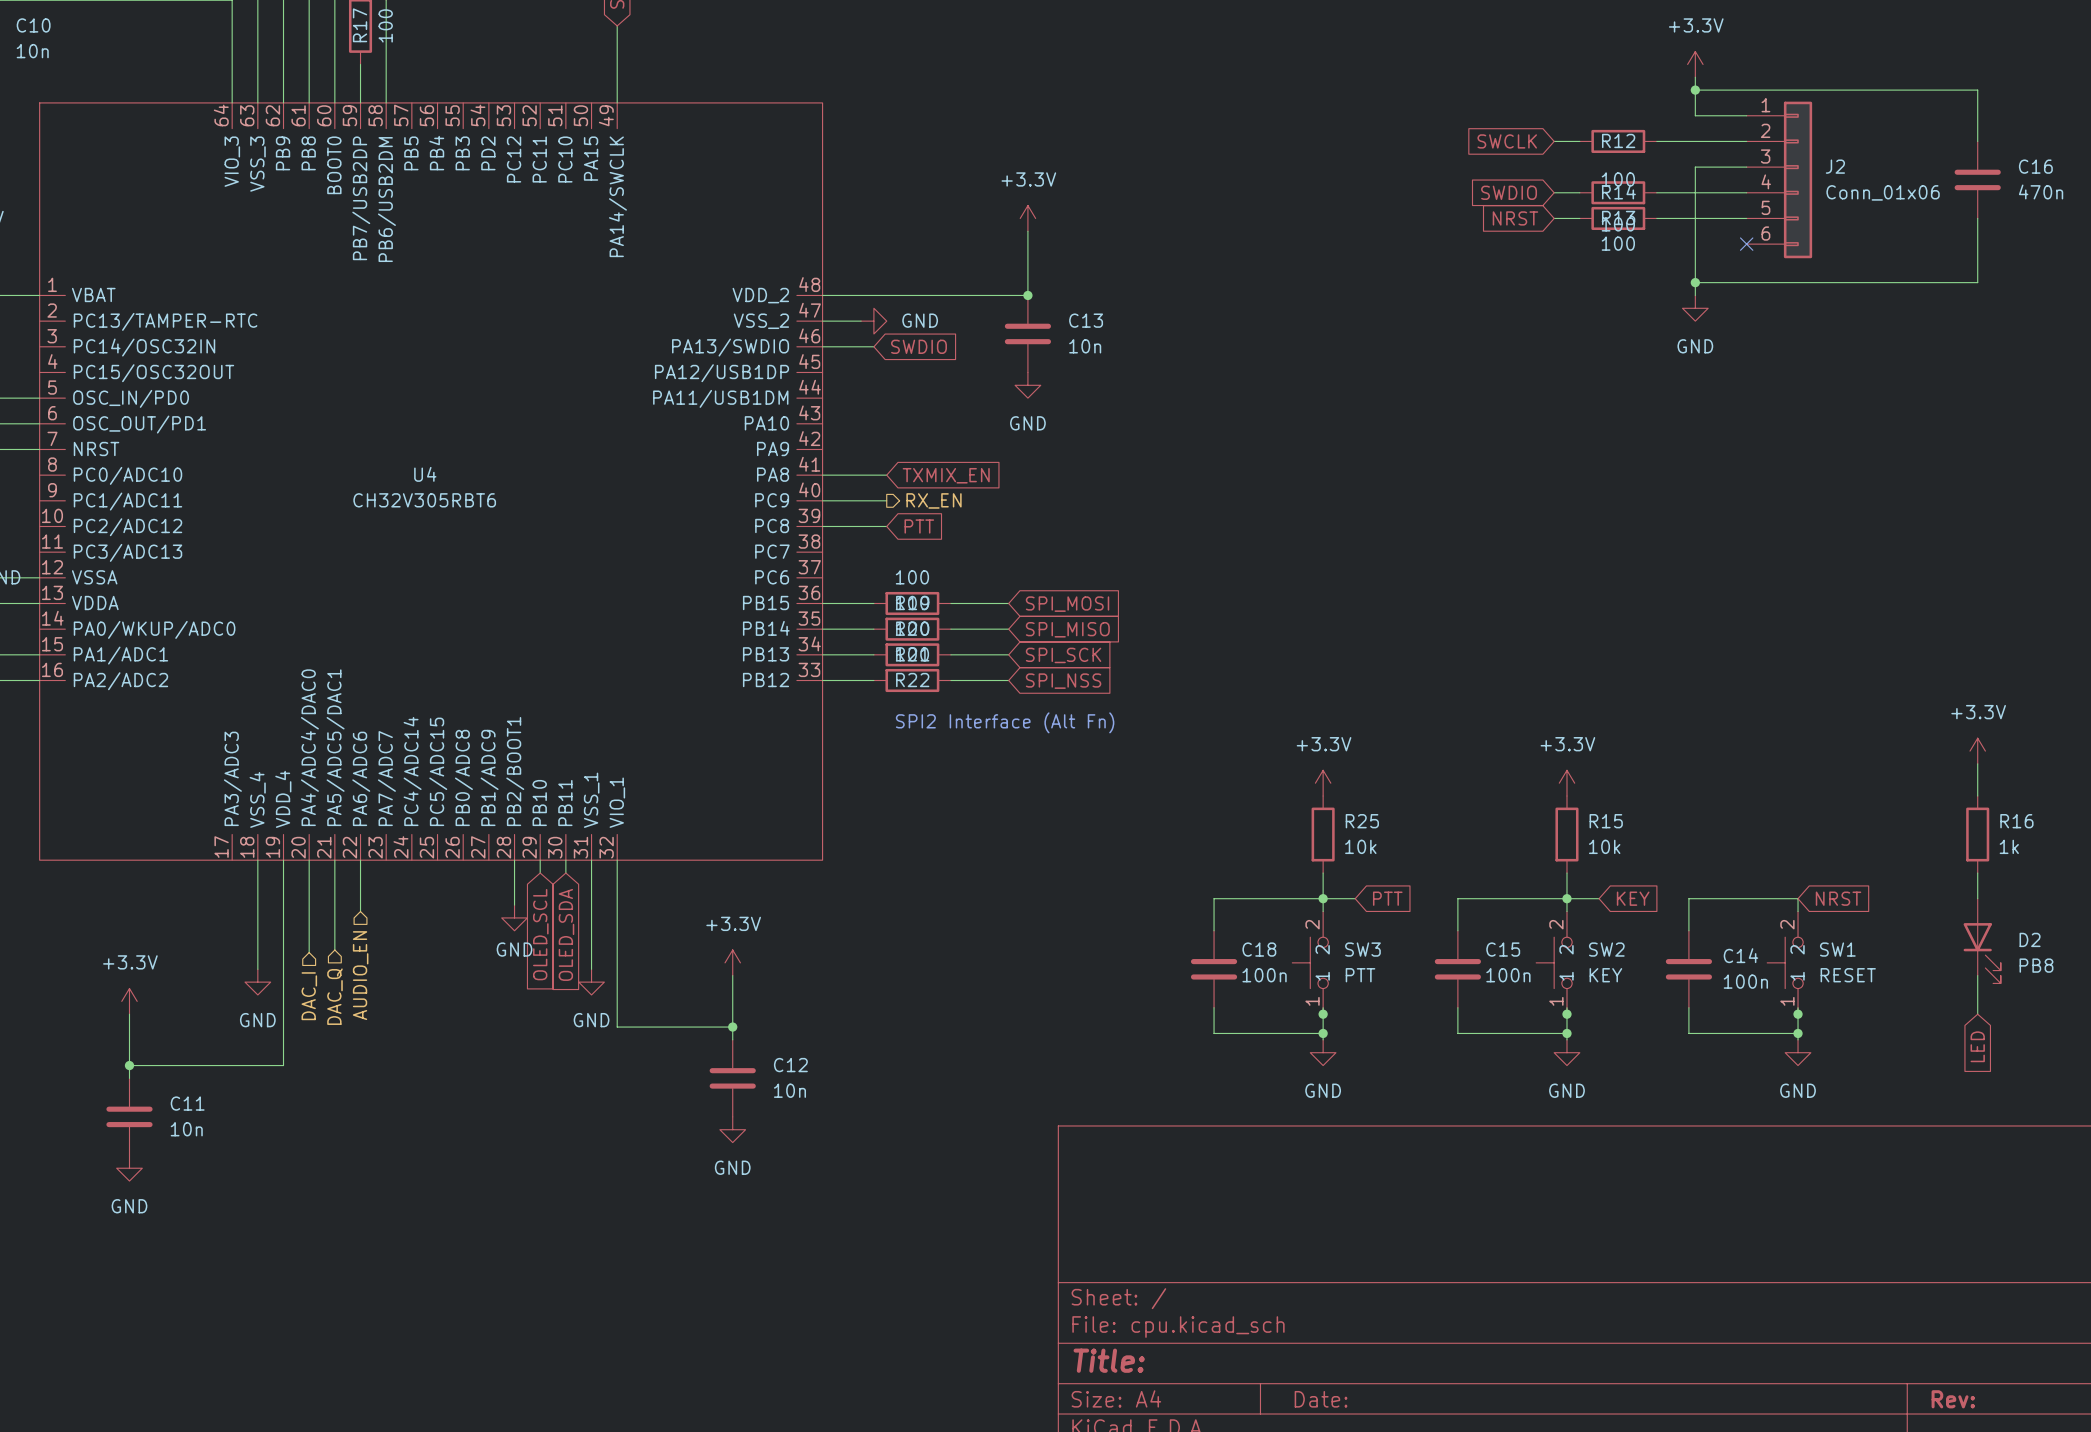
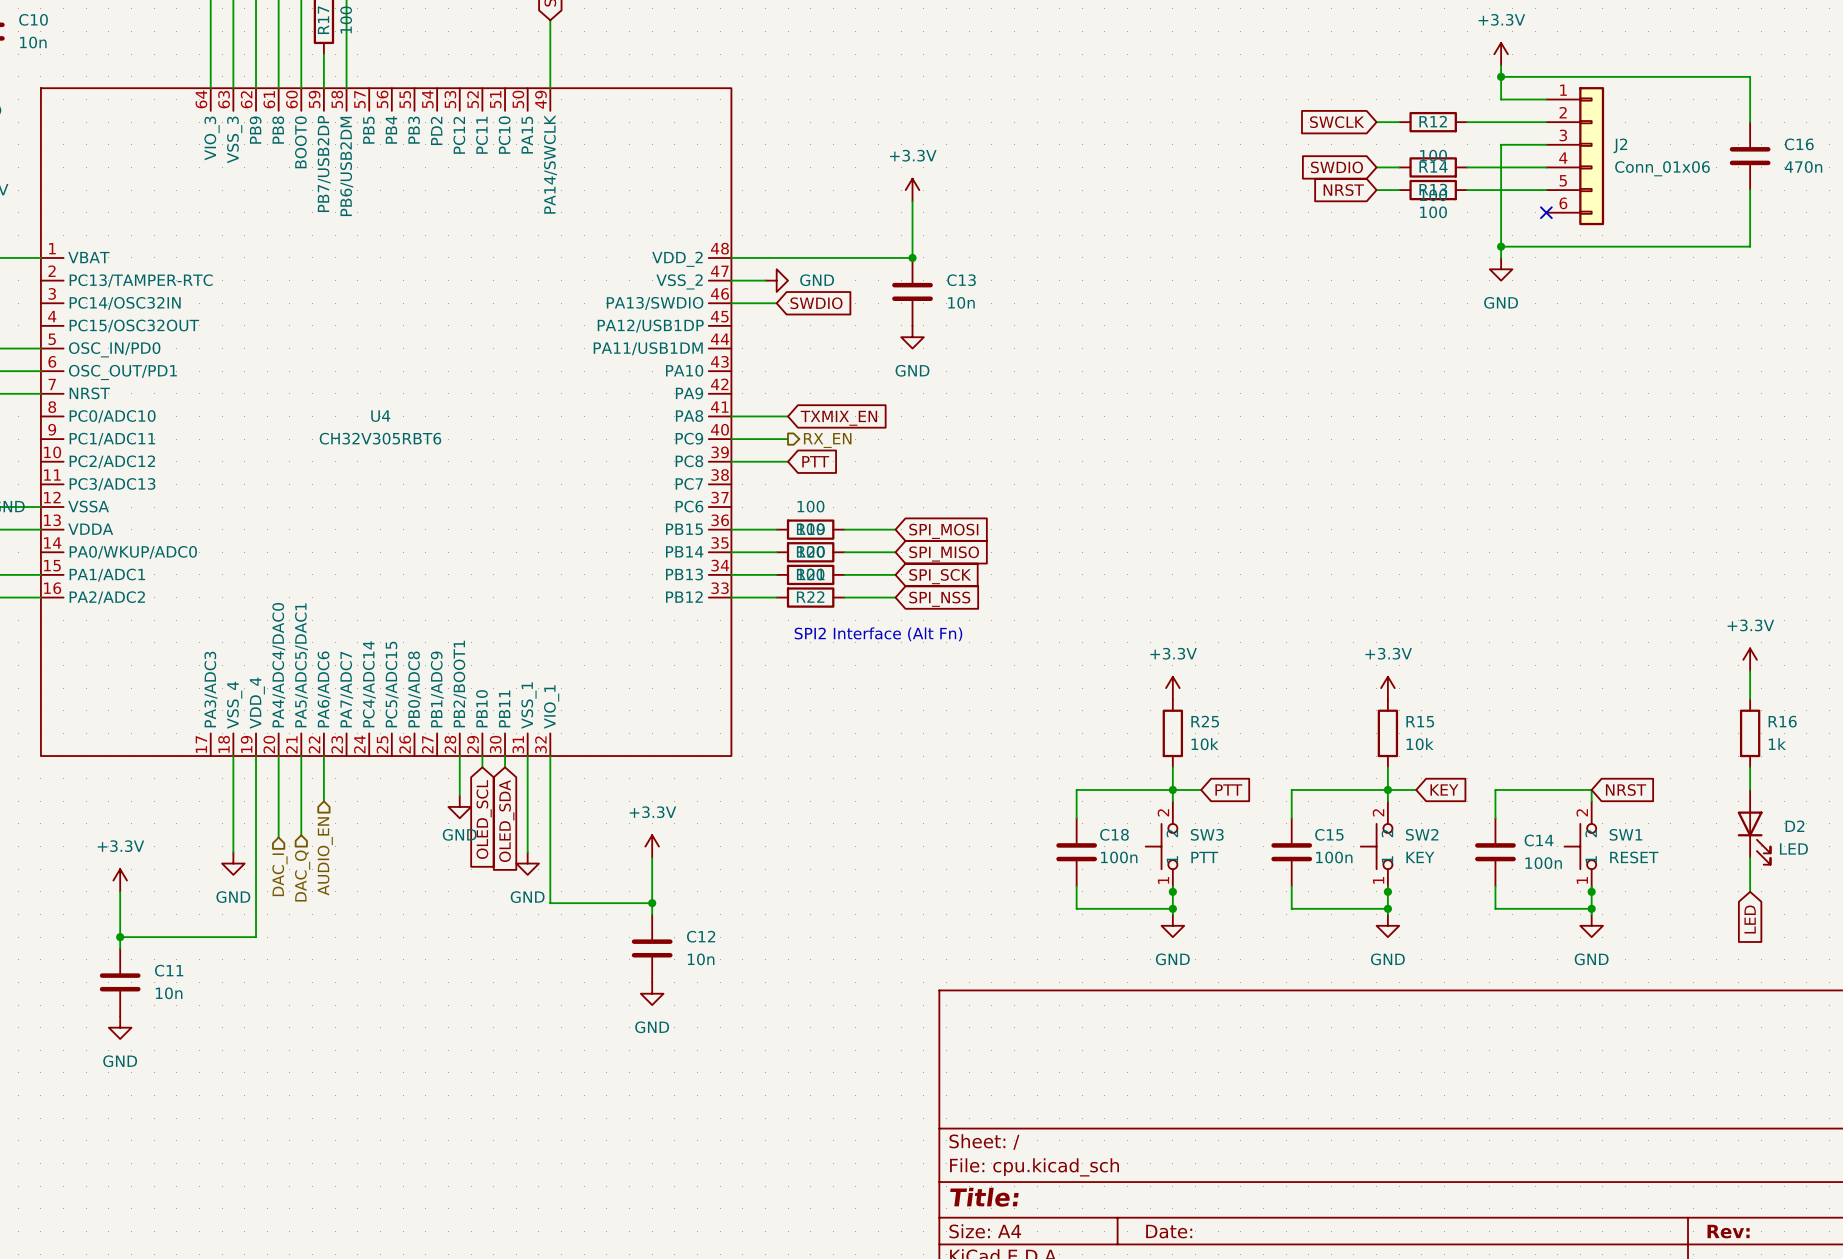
D2 value: PB8 (2036, 965) -> LED (1793, 848)

